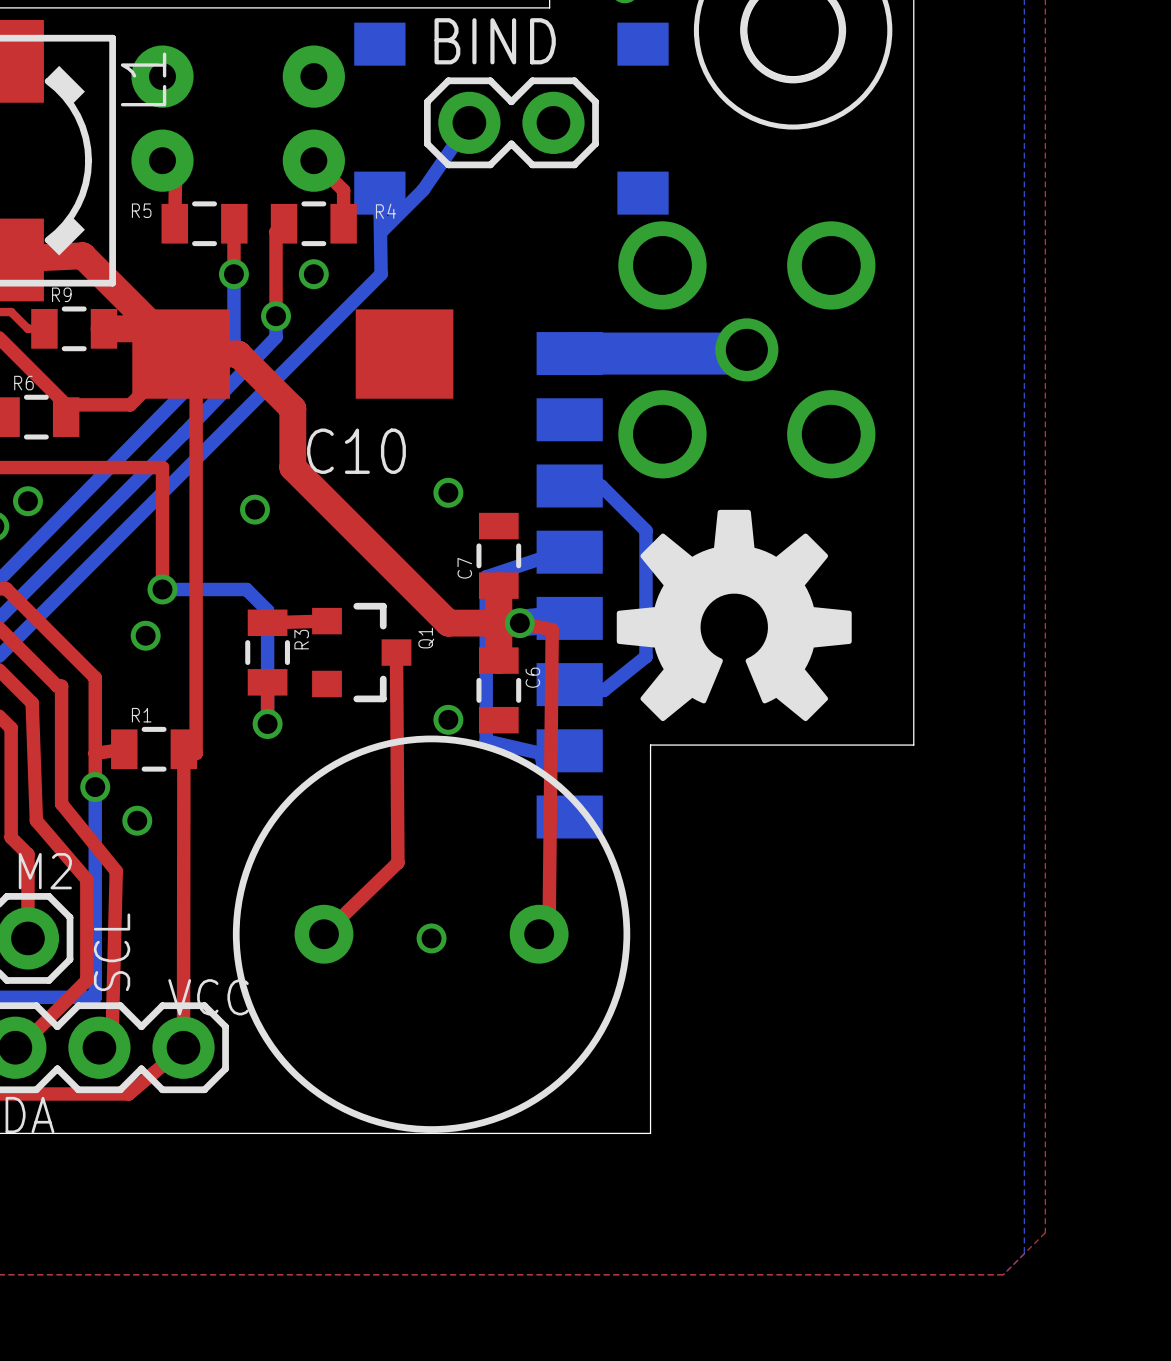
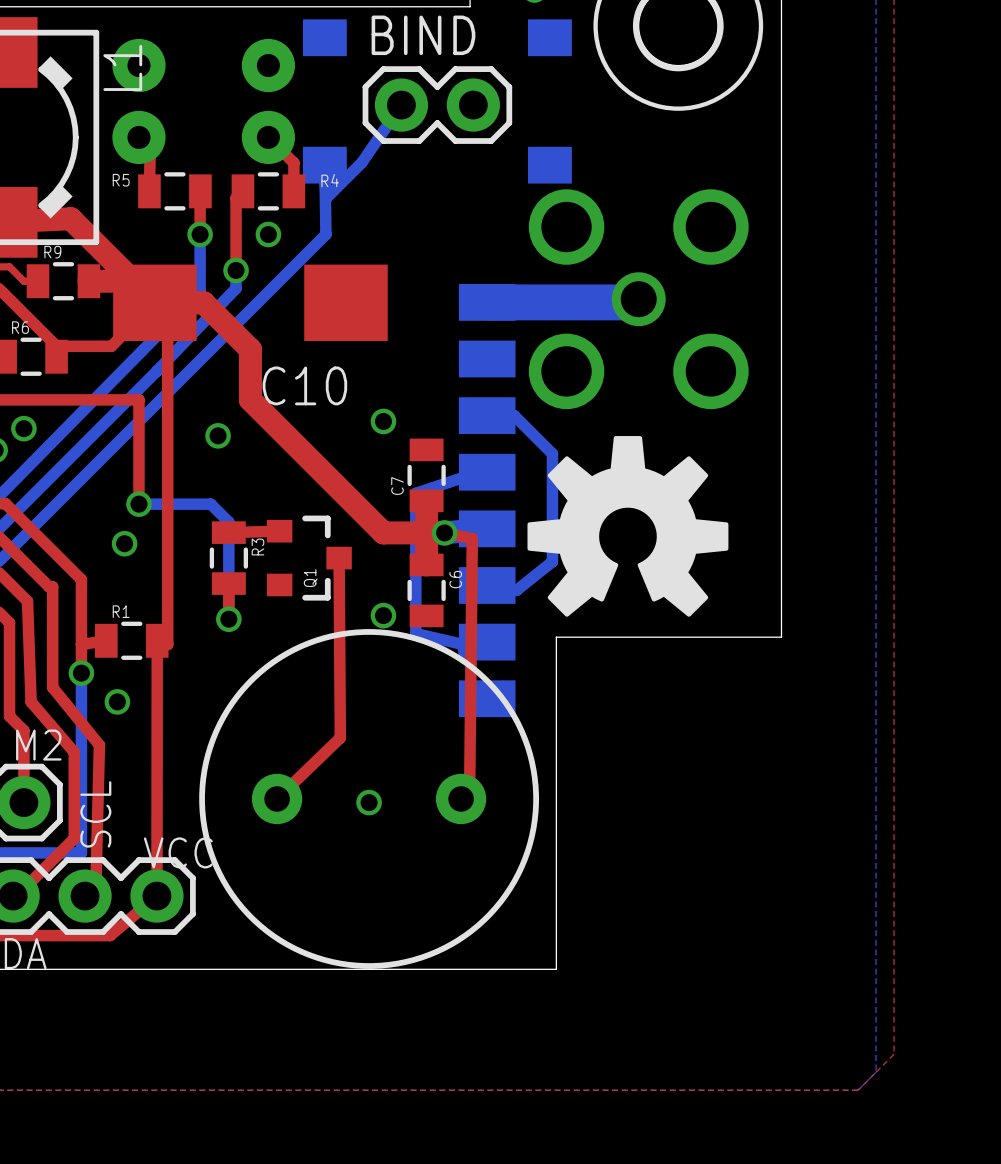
Q1 name position: Q1 (426, 638) -> Q1 (310, 578)

